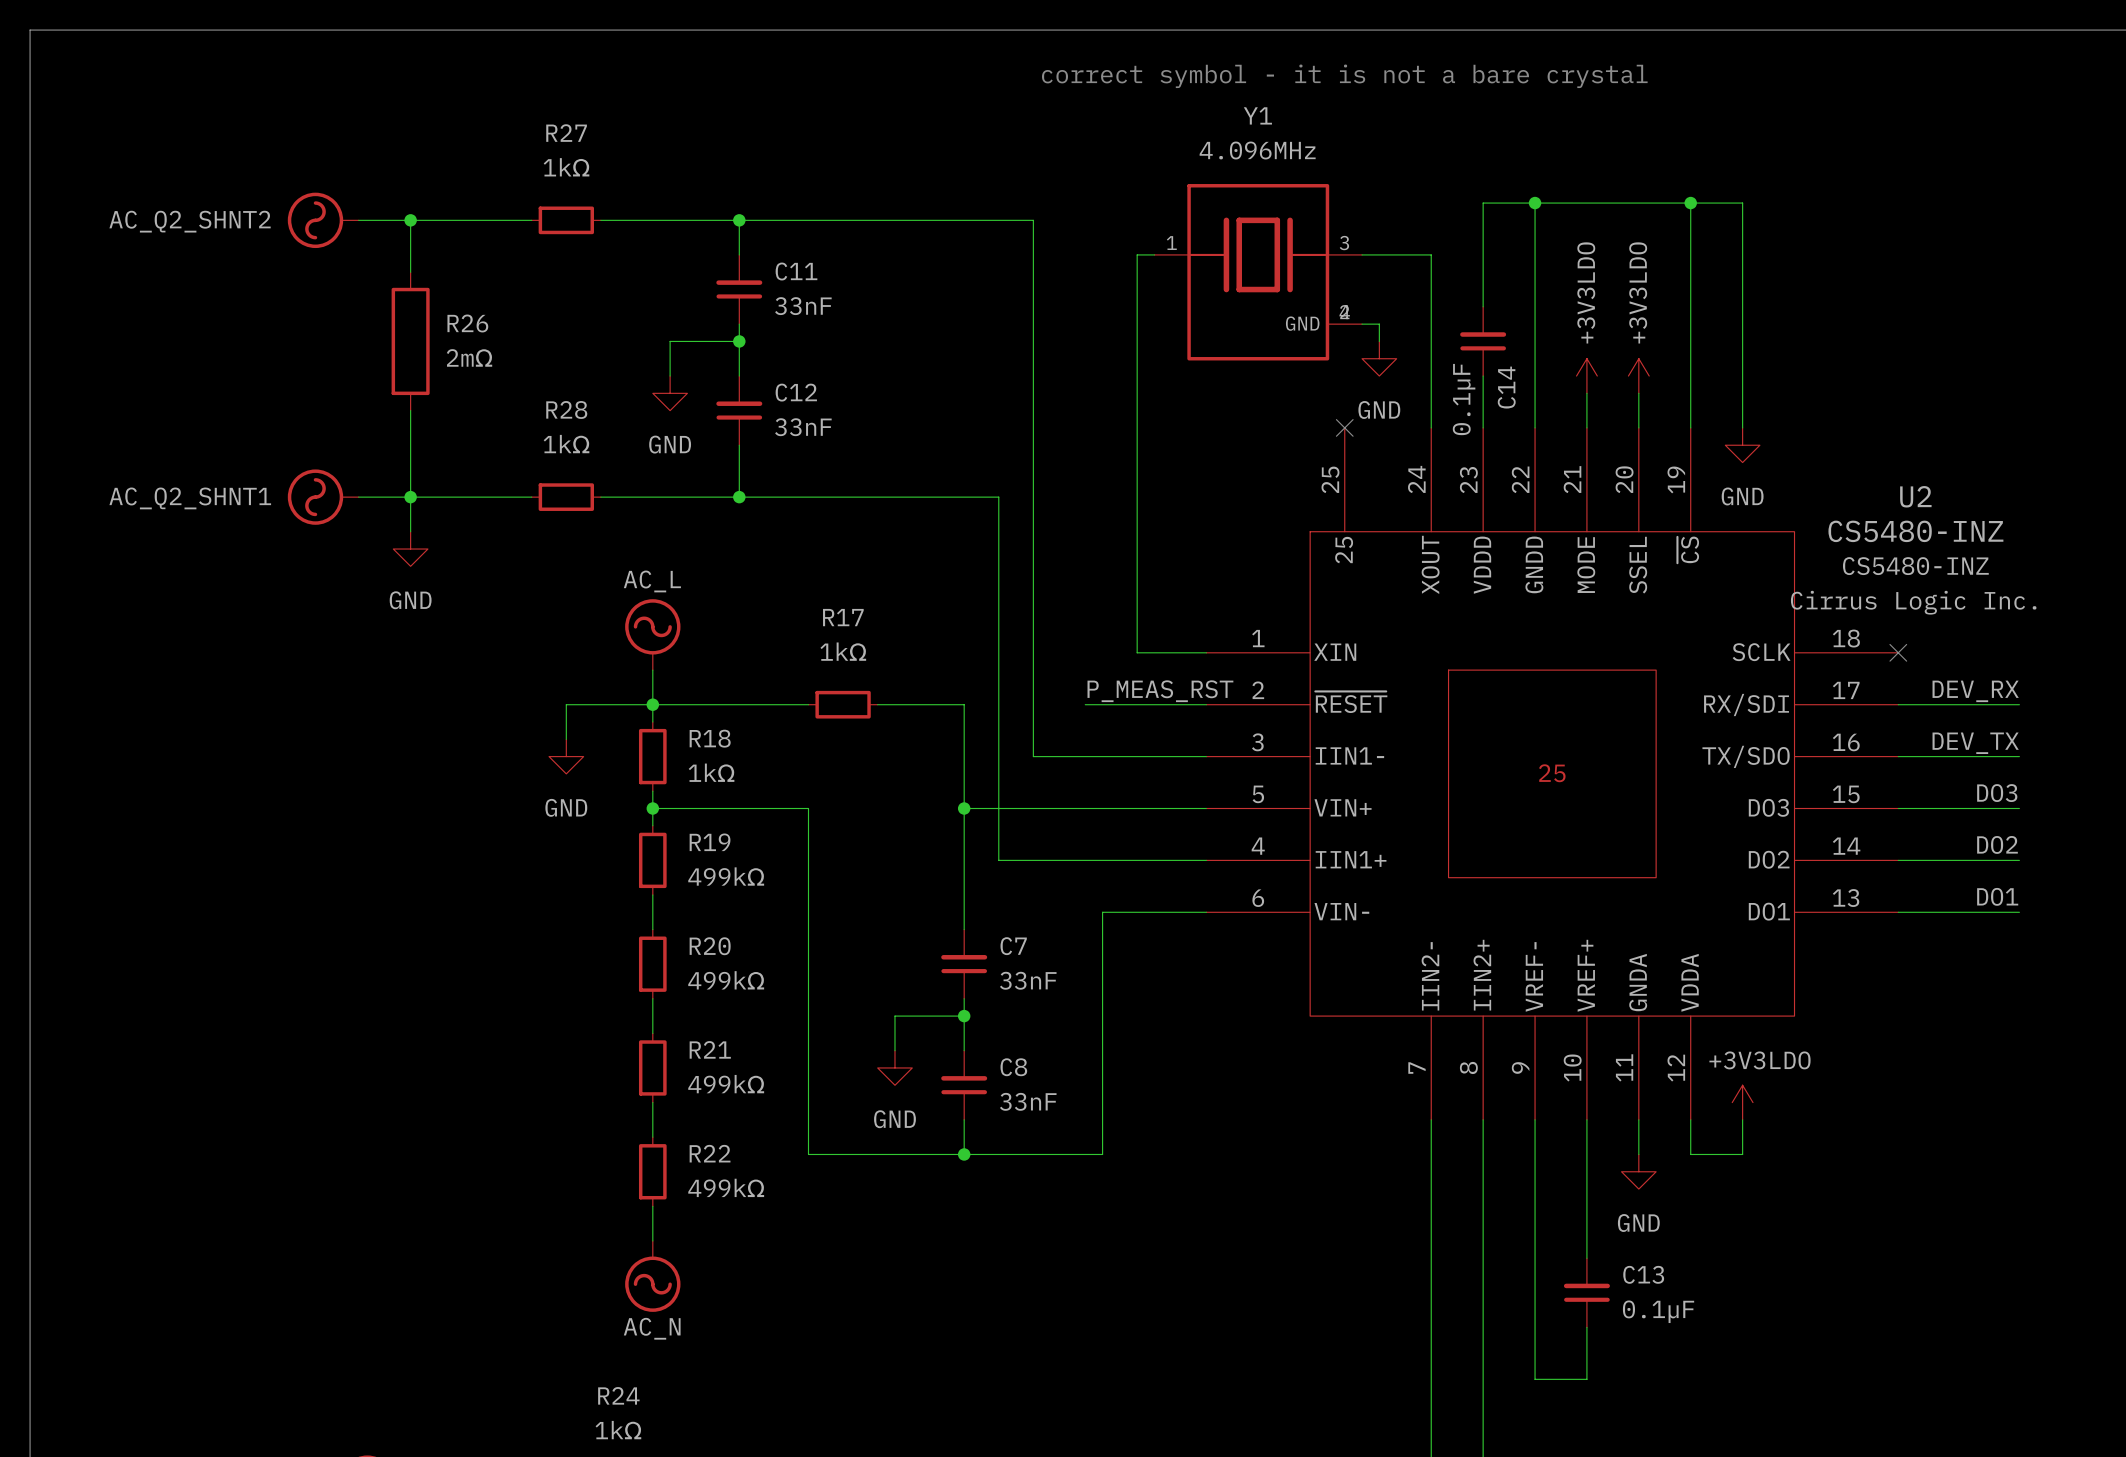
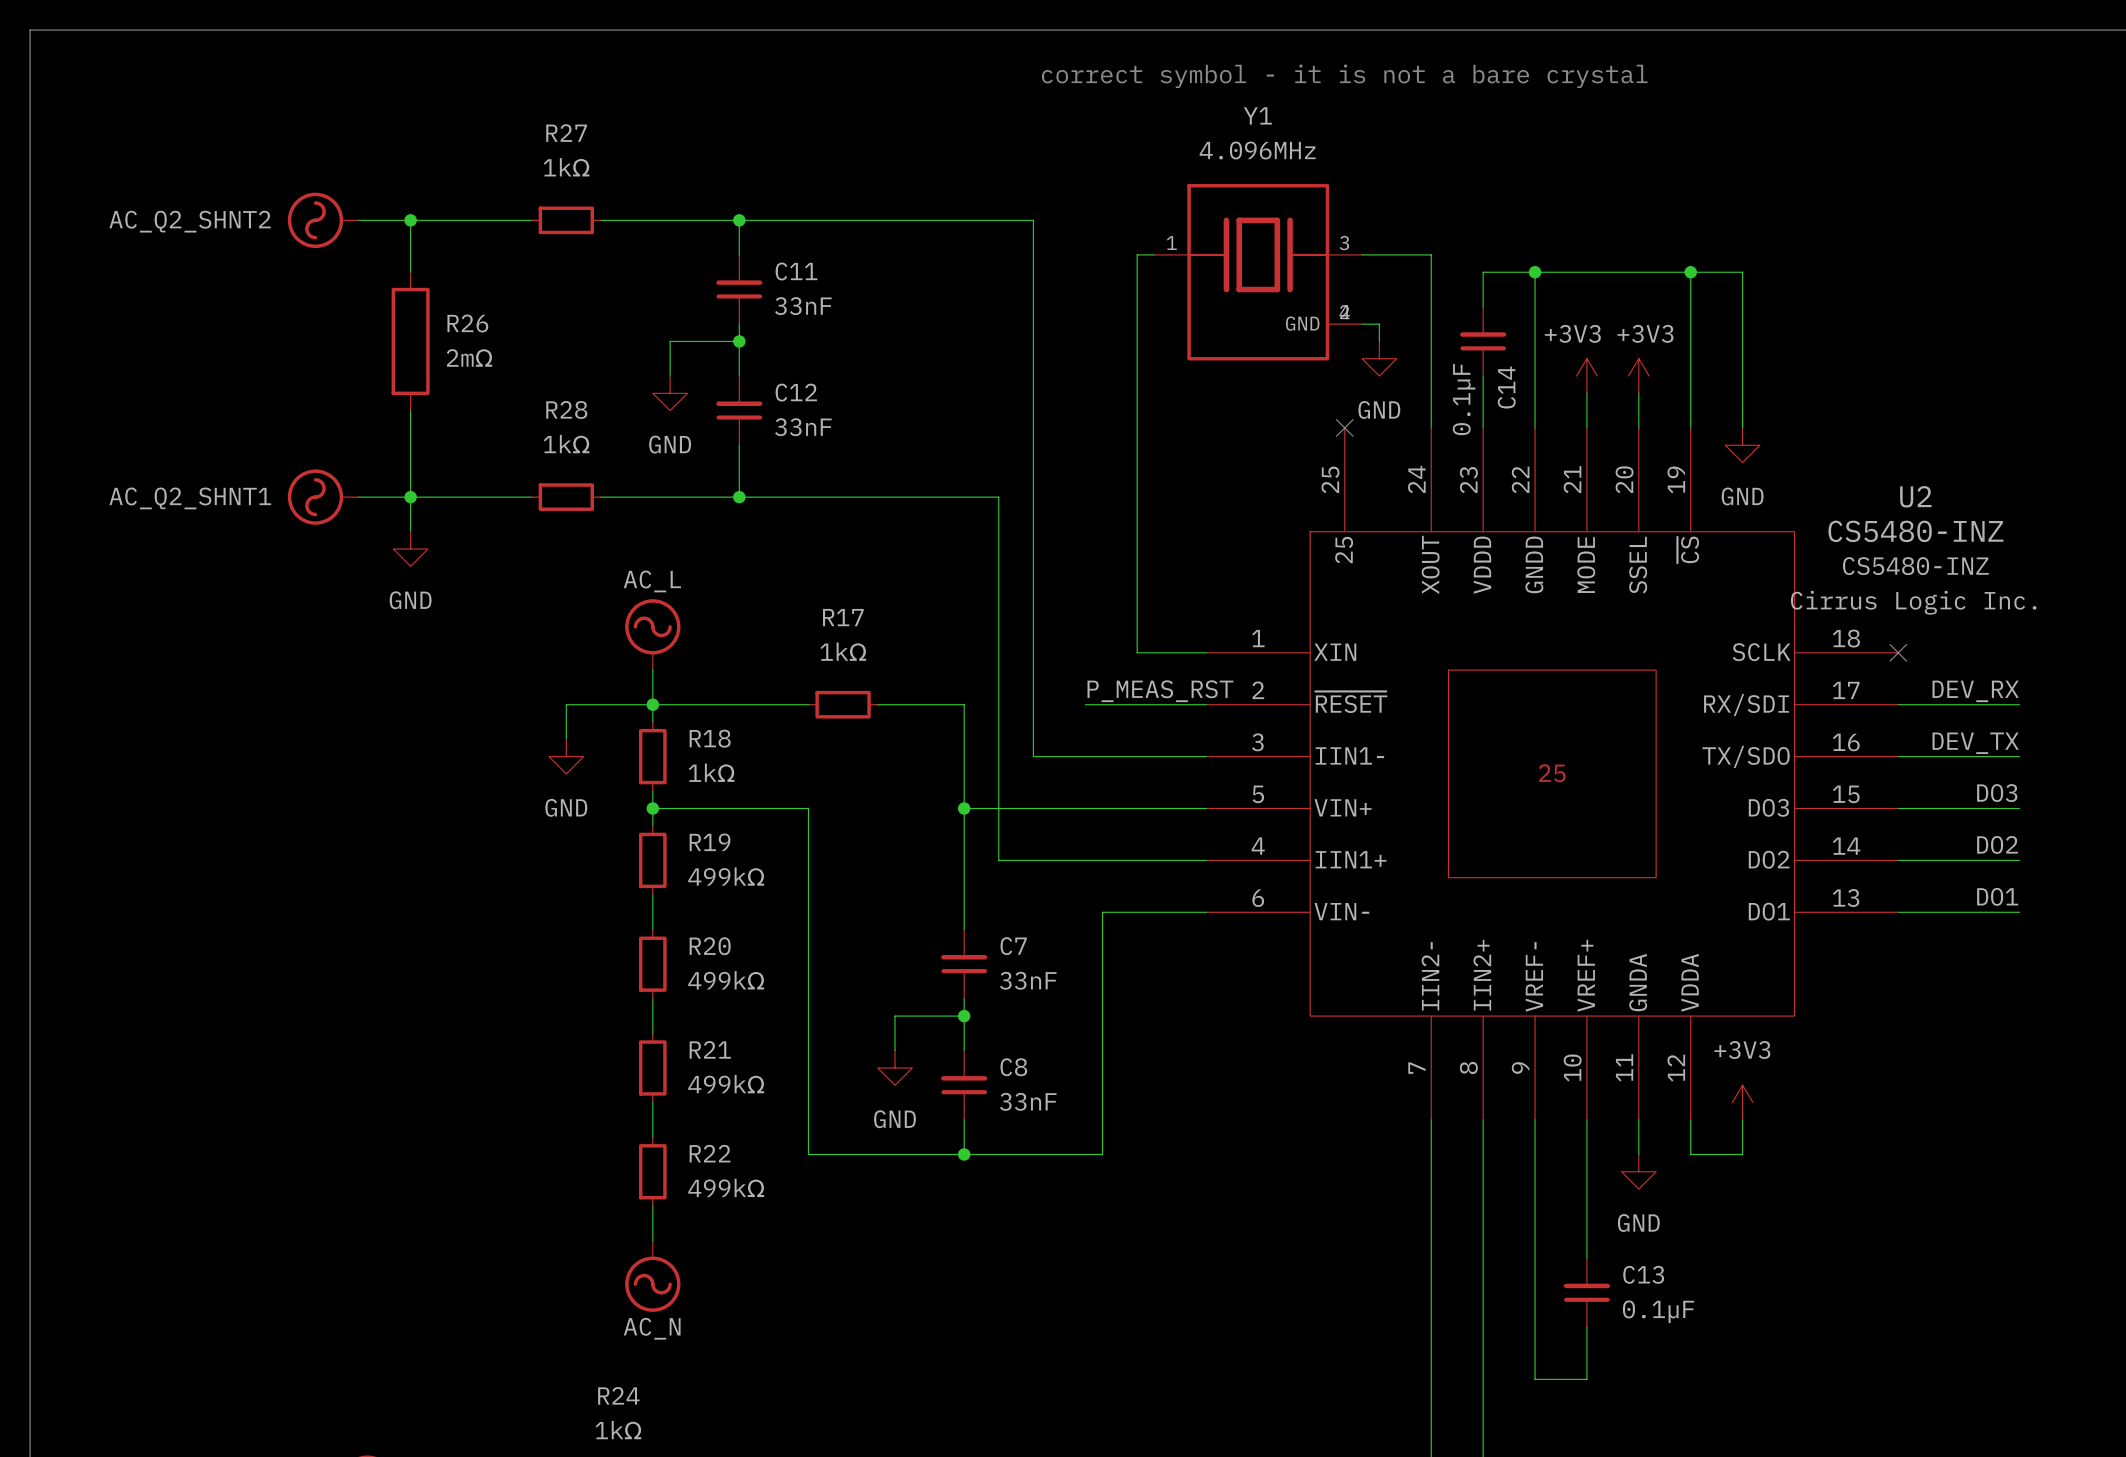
wire: (1535, 203) (1535, 272) -> none
junction position: (1535, 203) -> (1535, 272)
wire: (1690, 203) (1690, 272) -> none
junction position: (1690, 203) -> (1690, 272)
wire: (1483, 272) (1483, 203) (1742, 203) (1742, 272) -> (1483, 272) (1742, 272)
power symbol: +3V3LDO (1586, 376) -> +3V3 (1586, 376)
power symbol: +3V3LDO (1638, 376) -> +3V3 (1638, 376)
power symbol: +3V3LDO (1742, 1102) -> +3V3 (1742, 1102)

